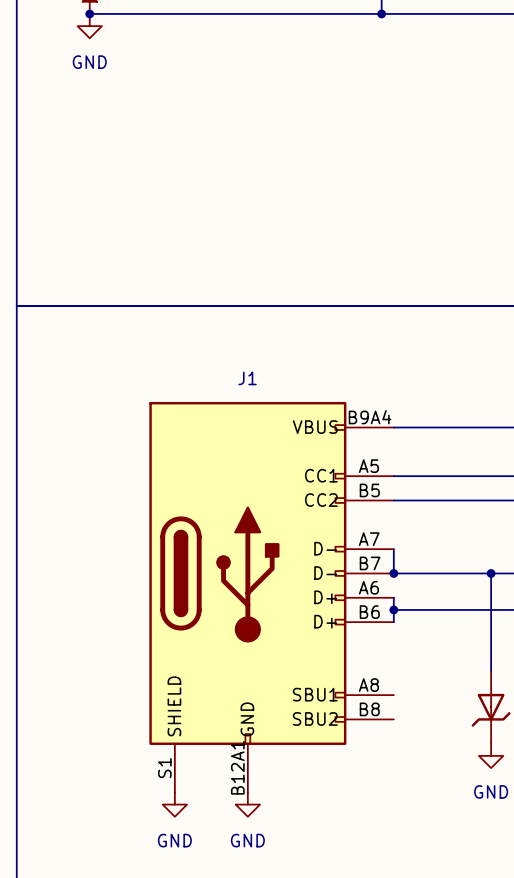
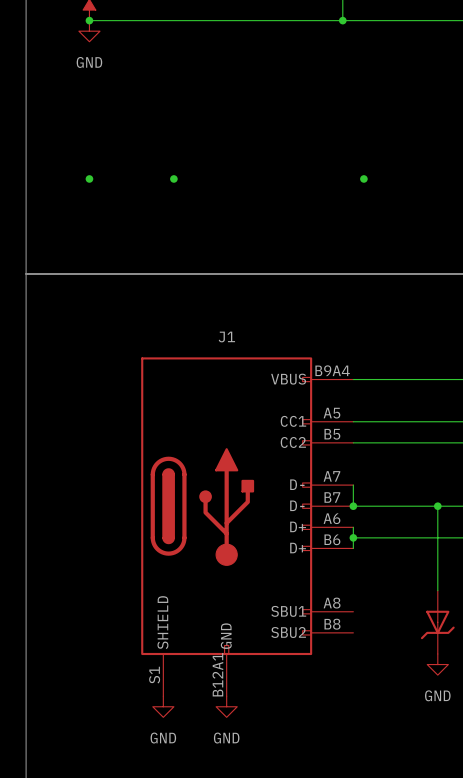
junction: none -> (89, 178)
junction: none -> (173, 178)
junction: none -> (363, 178)

